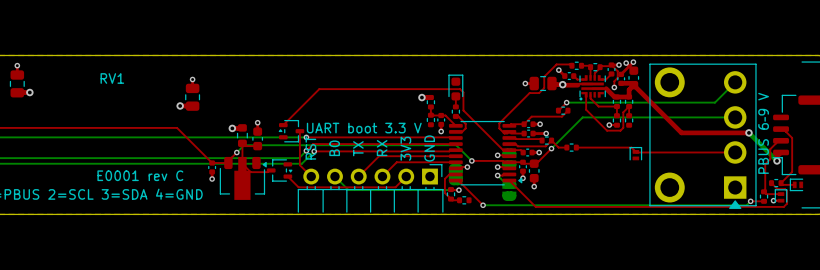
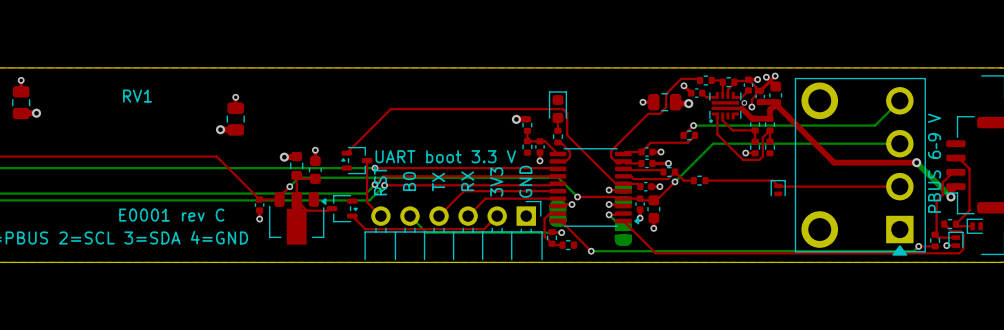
top track: (592, 84) (562, 84) -> none
via: none -> (744, 102)

